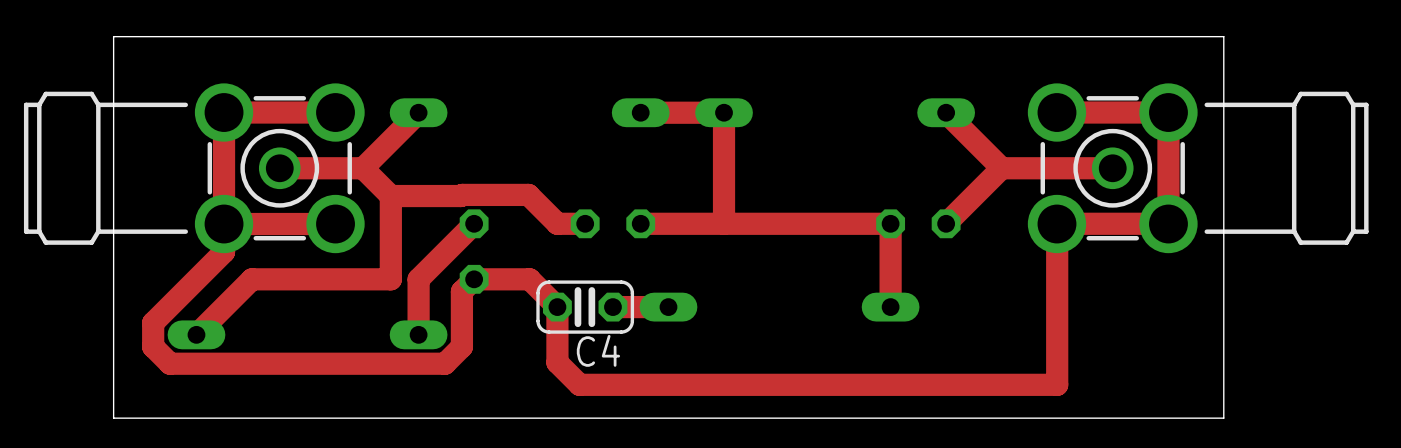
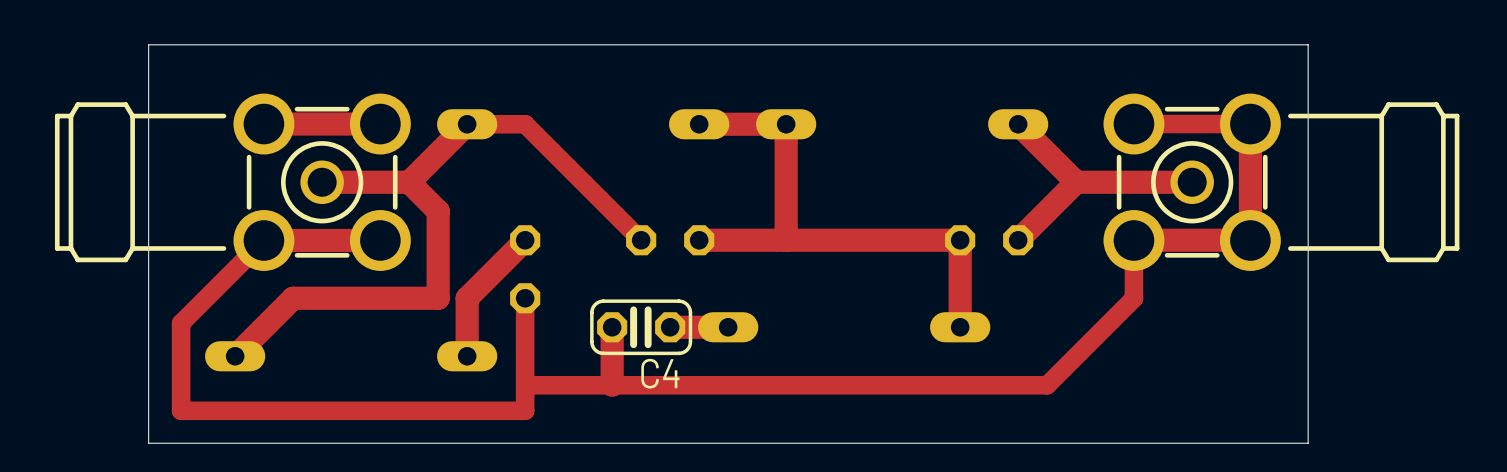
top track: (224, 112) (224, 252) (153, 322) (153, 346) (170, 363) (445, 363) (461, 346) (461, 291) (474, 279) (529, 279) (557, 307) -> none
top track width: thick (1056, 112) (1164, 112) (1166, 114) -> thin (1133, 124) (1246, 124) (1248, 126)
top track: (390, 196) (528, 194) (557, 223) (585, 223) -> (467, 124) (525, 124) (641, 240)
top track: none -> (380, 240) (264, 240) (181, 323) (181, 410) (525, 410) (525, 298)
top track: (1057, 224) (1057, 384) (579, 384) (557, 362) -> (1133, 240) (1133, 298) (1047, 385) (525, 385)

